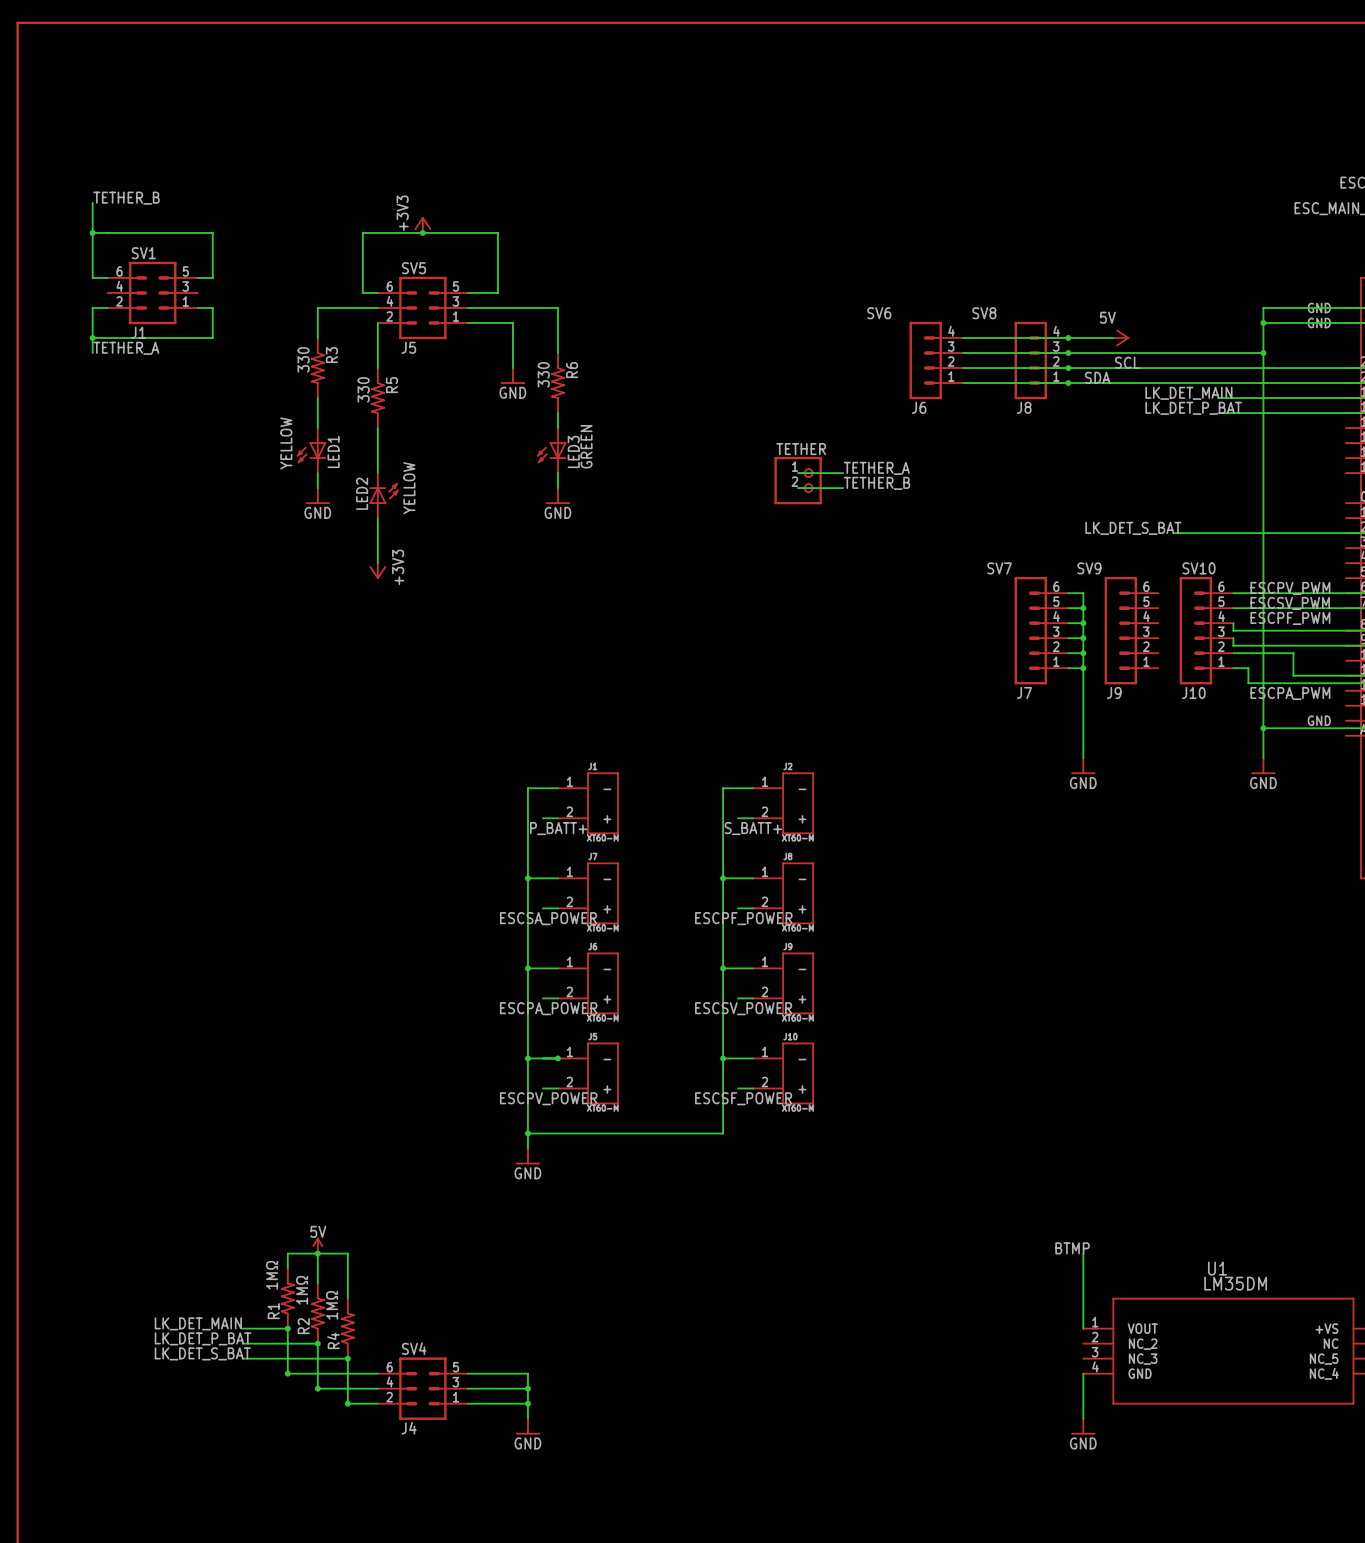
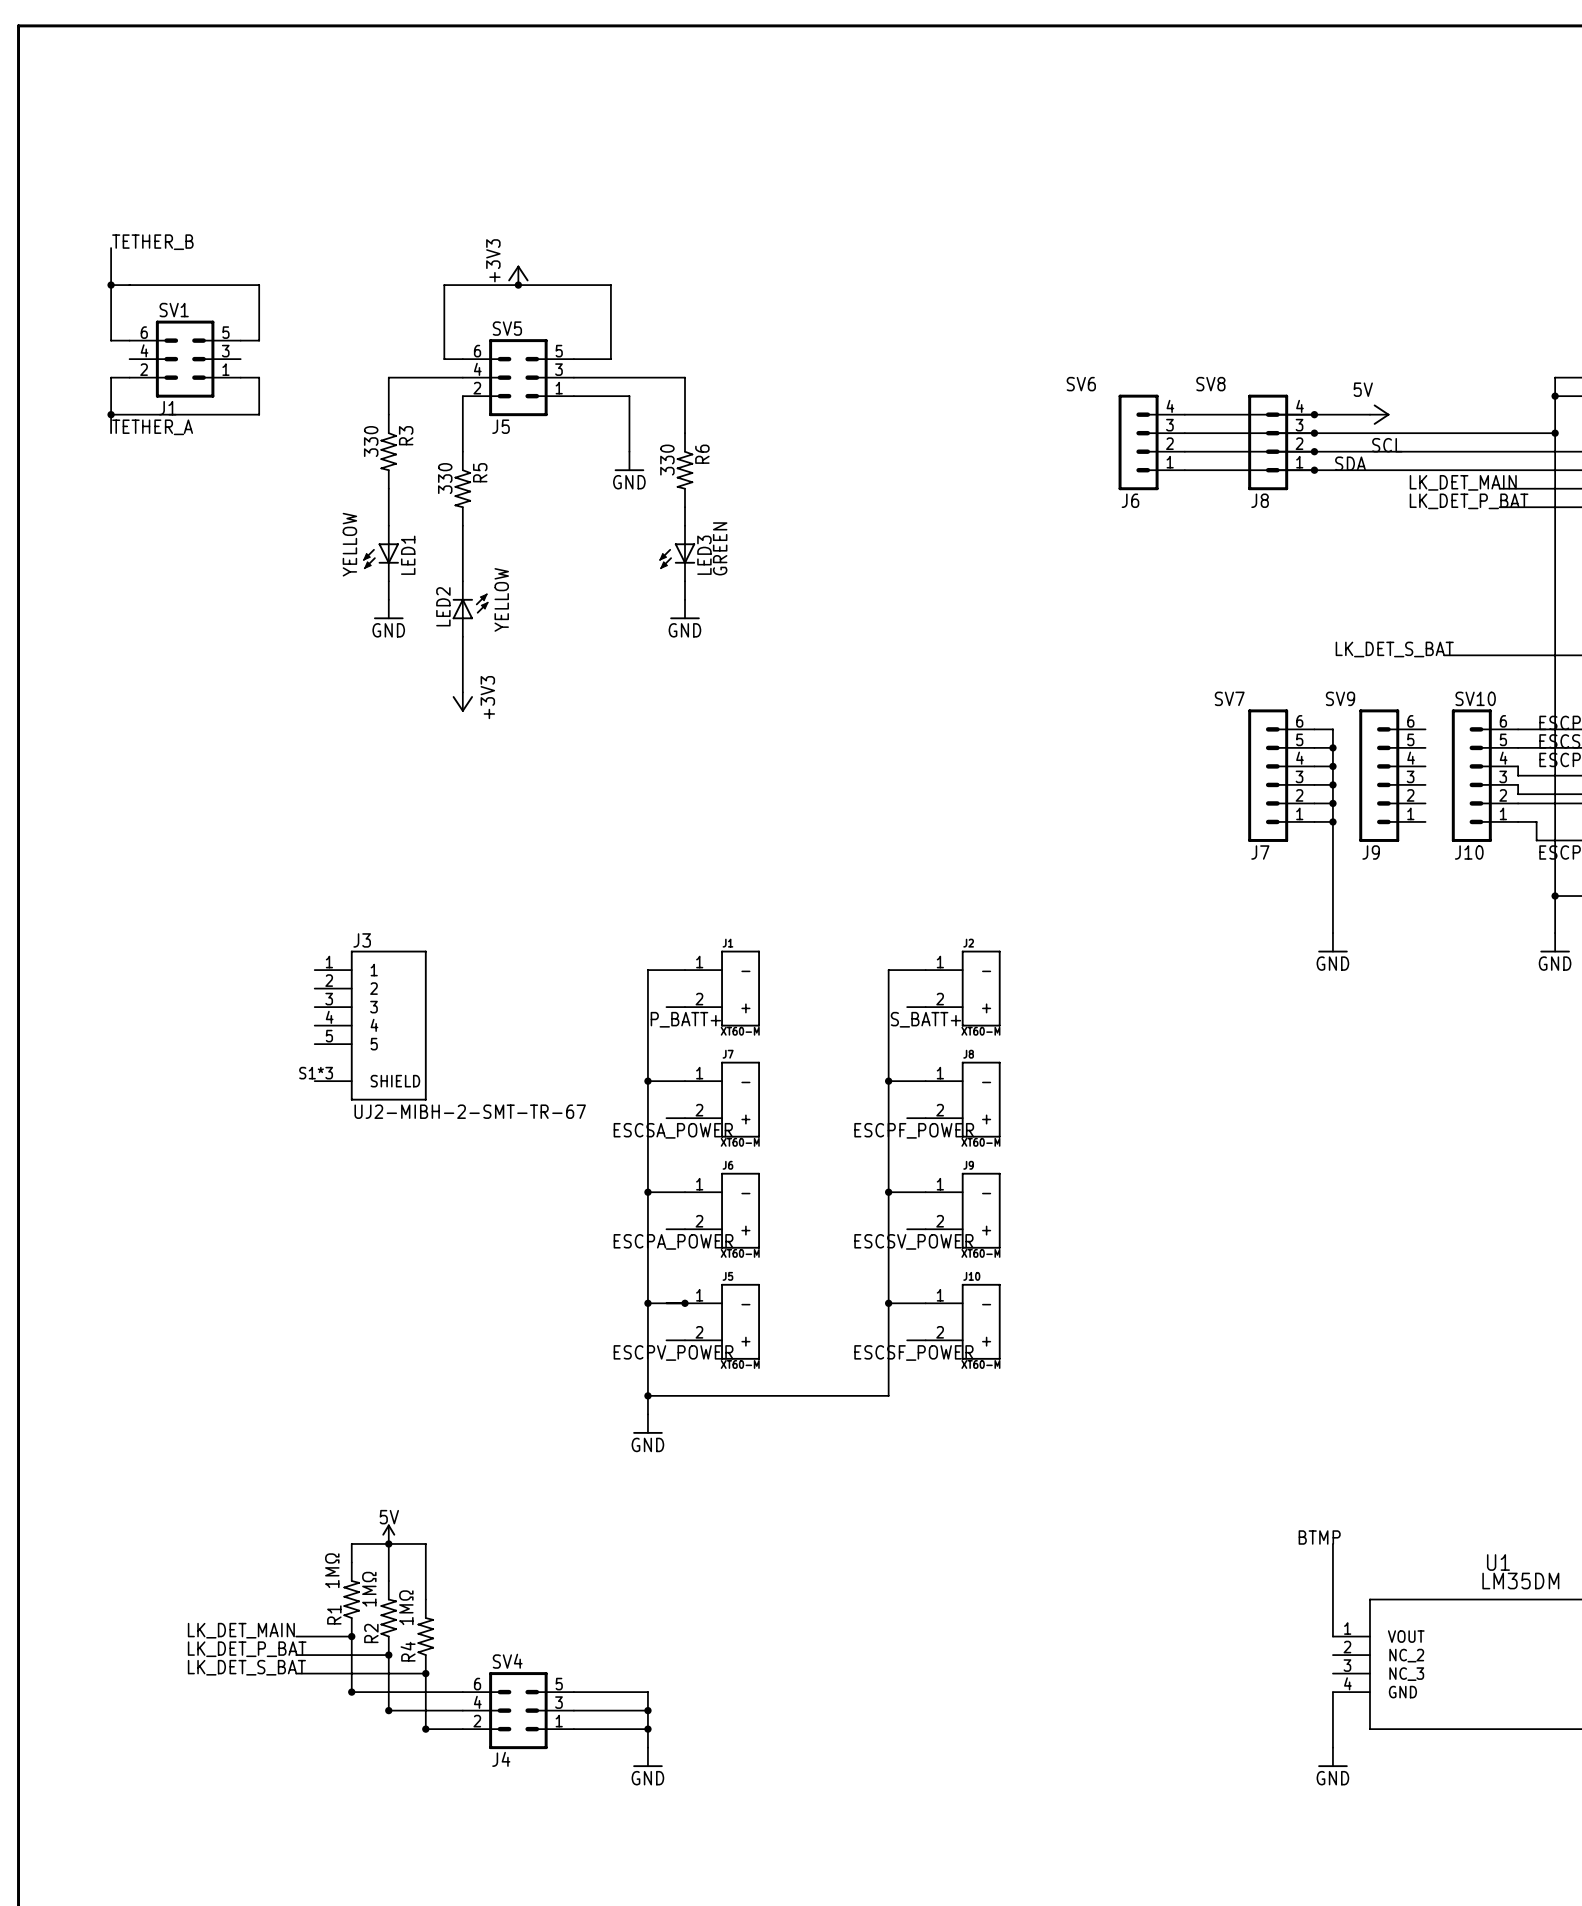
label: TETHER_A (876, 468) -> none
wire: (798, 473) (843, 473) -> none
TETHER: (798, 480) -> none
label: TETHER_B (877, 483) -> none
wire: (798, 488) (843, 488) -> none
J3: none -> UJ2-MIBH-2-SMT-TR-67 (370, 1025)

